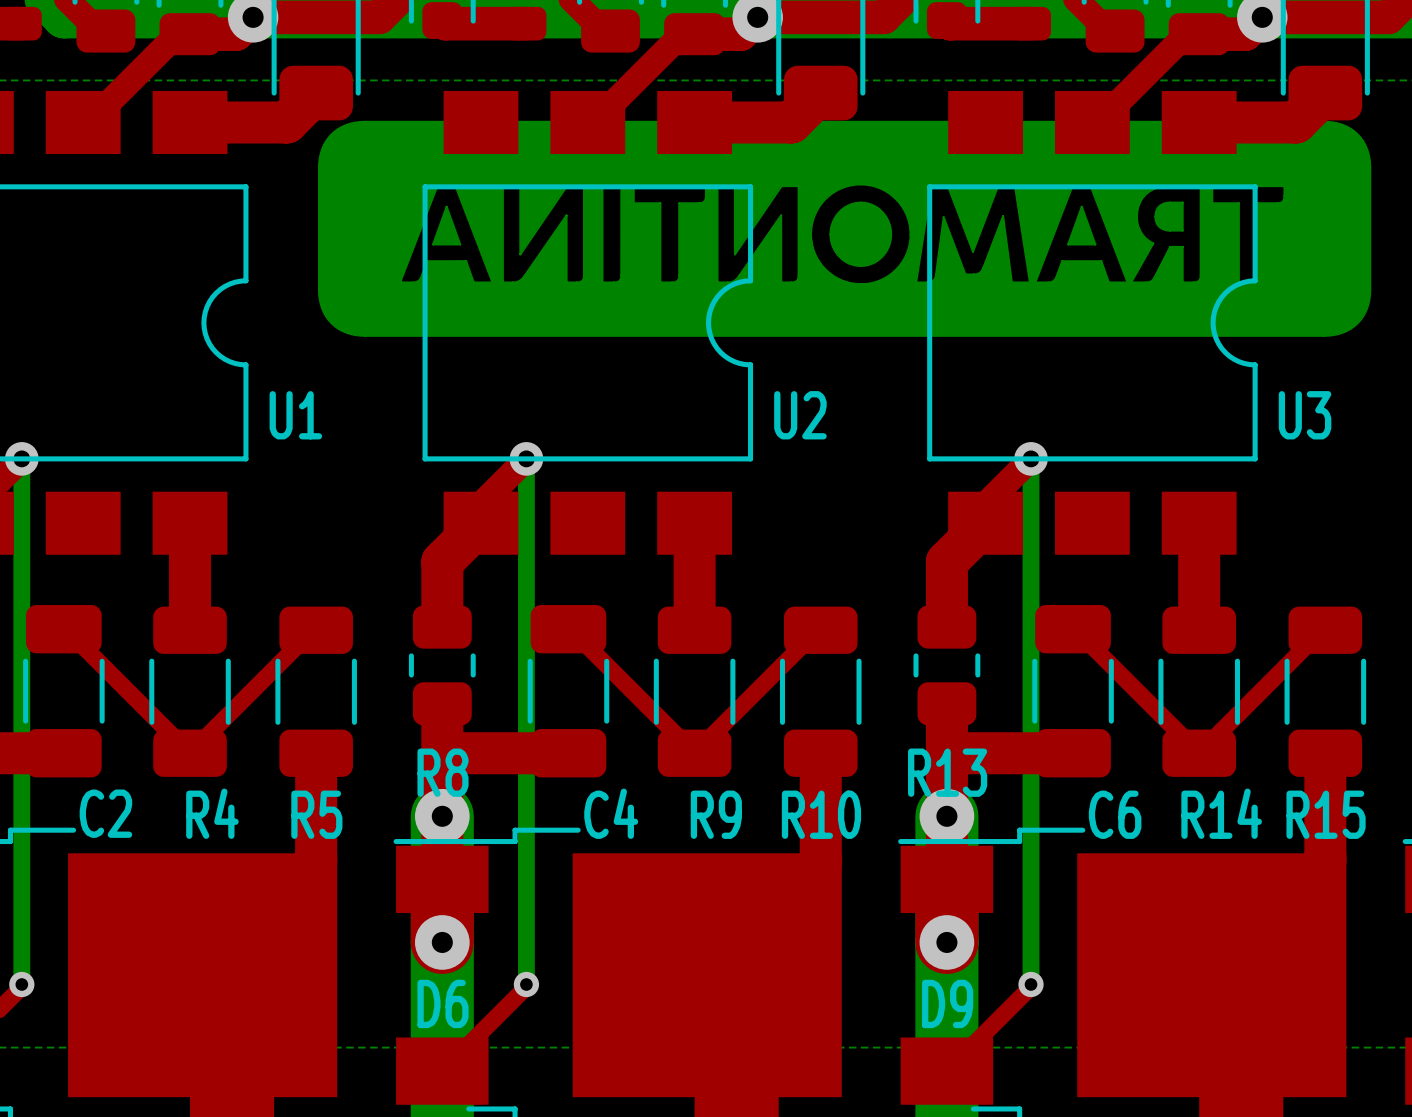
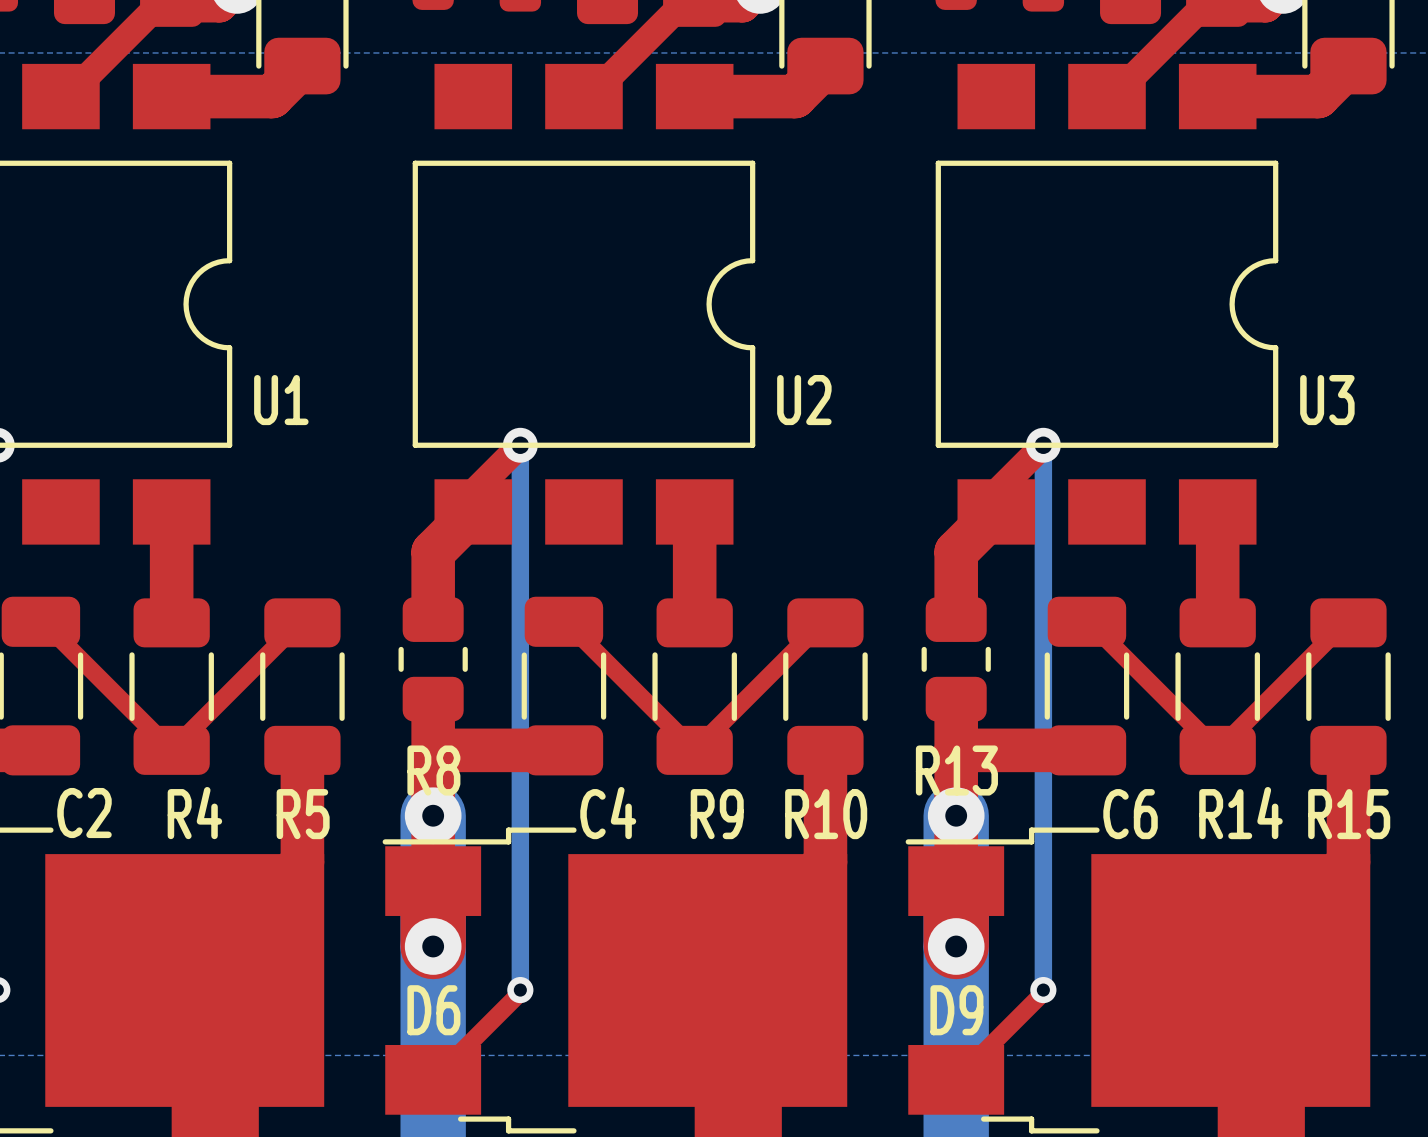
drawing: [317, 120, 1372, 337] -> none

